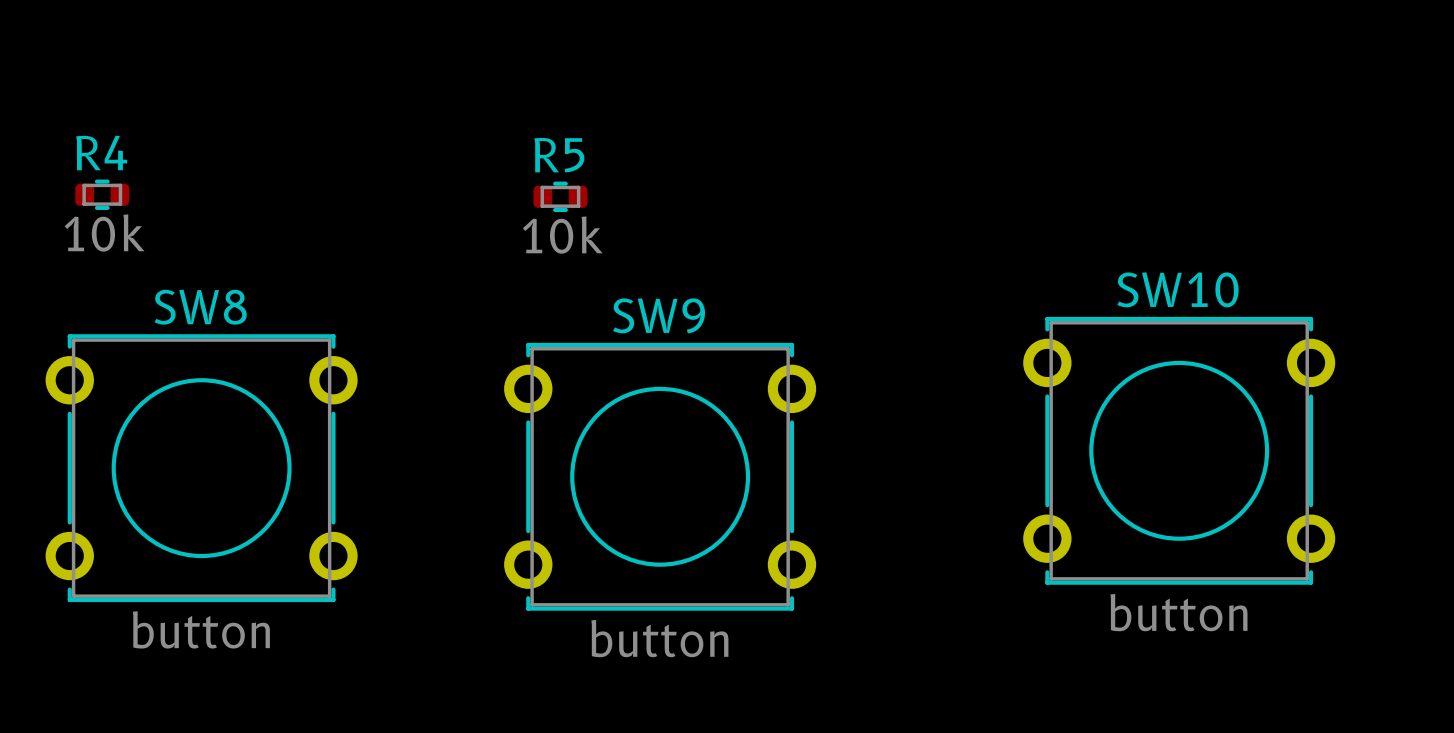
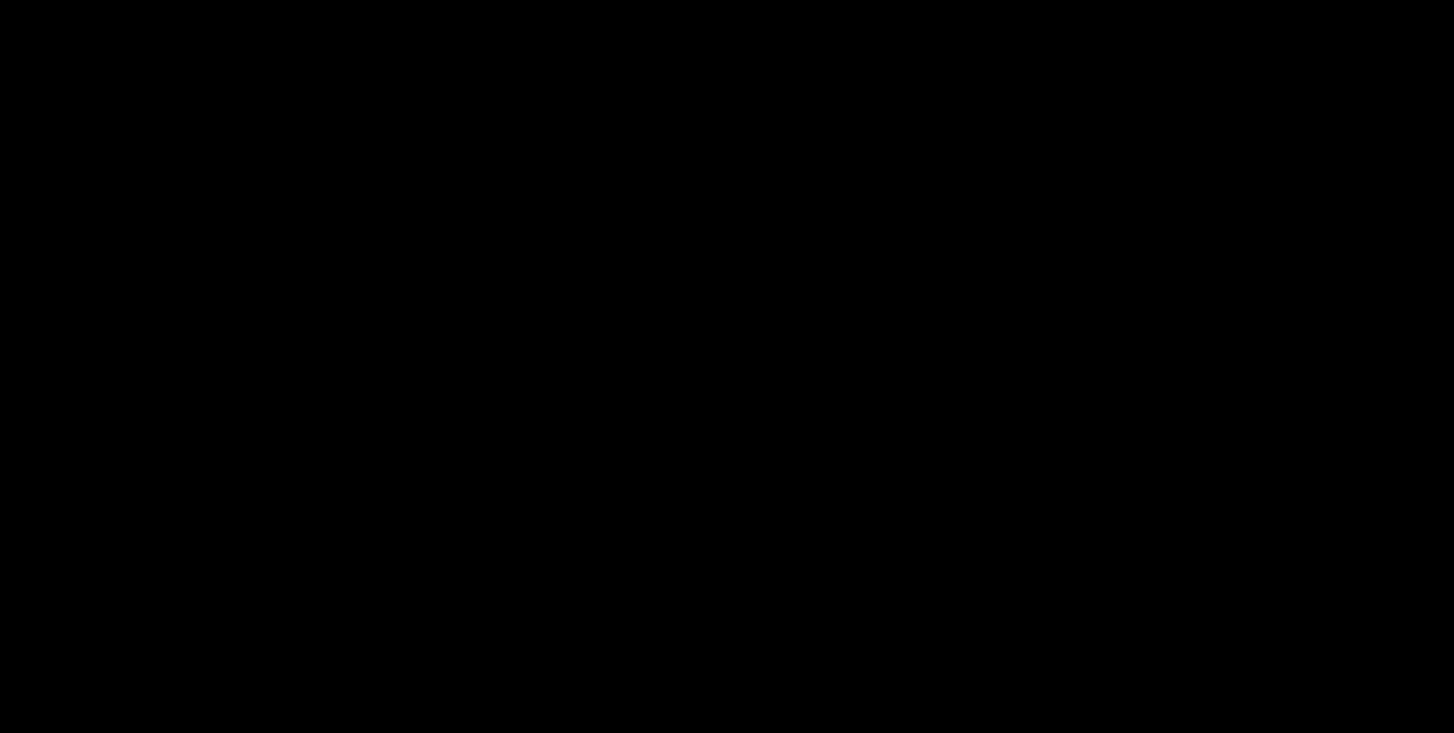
R4: 10k (102, 194) -> none
R5: 10k (560, 196) -> none
SW10: button (1179, 450) -> none
SW8: button (201, 468) -> none
SW9: button (660, 476) -> none

